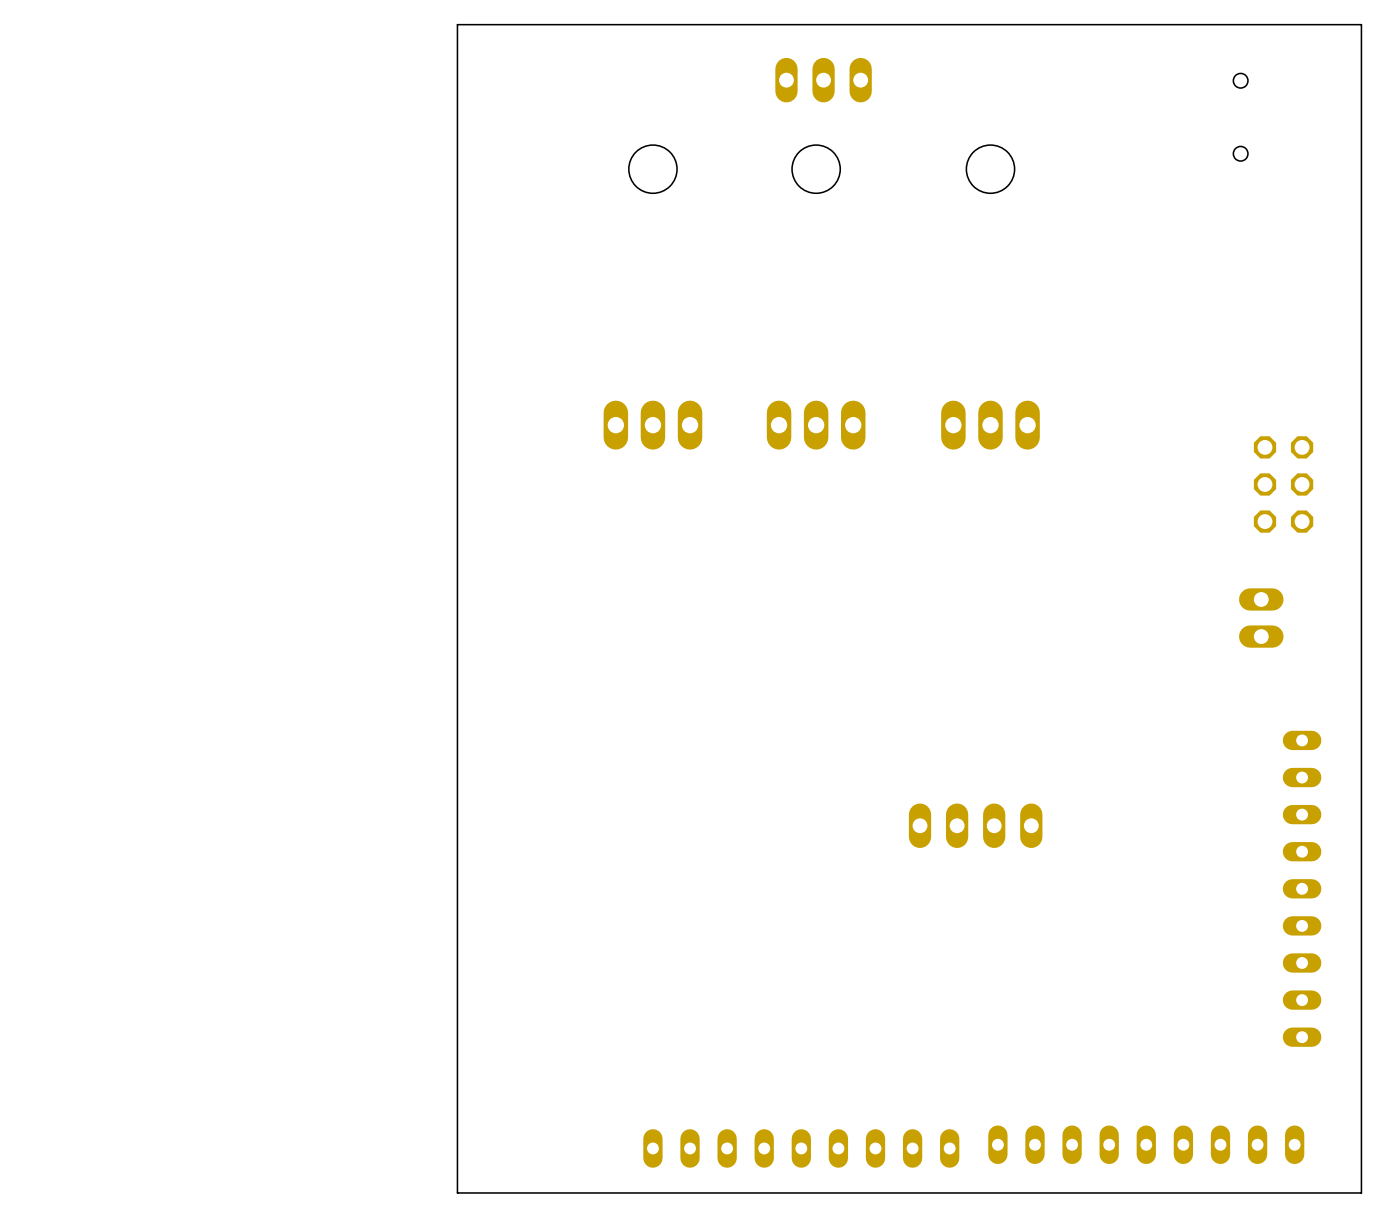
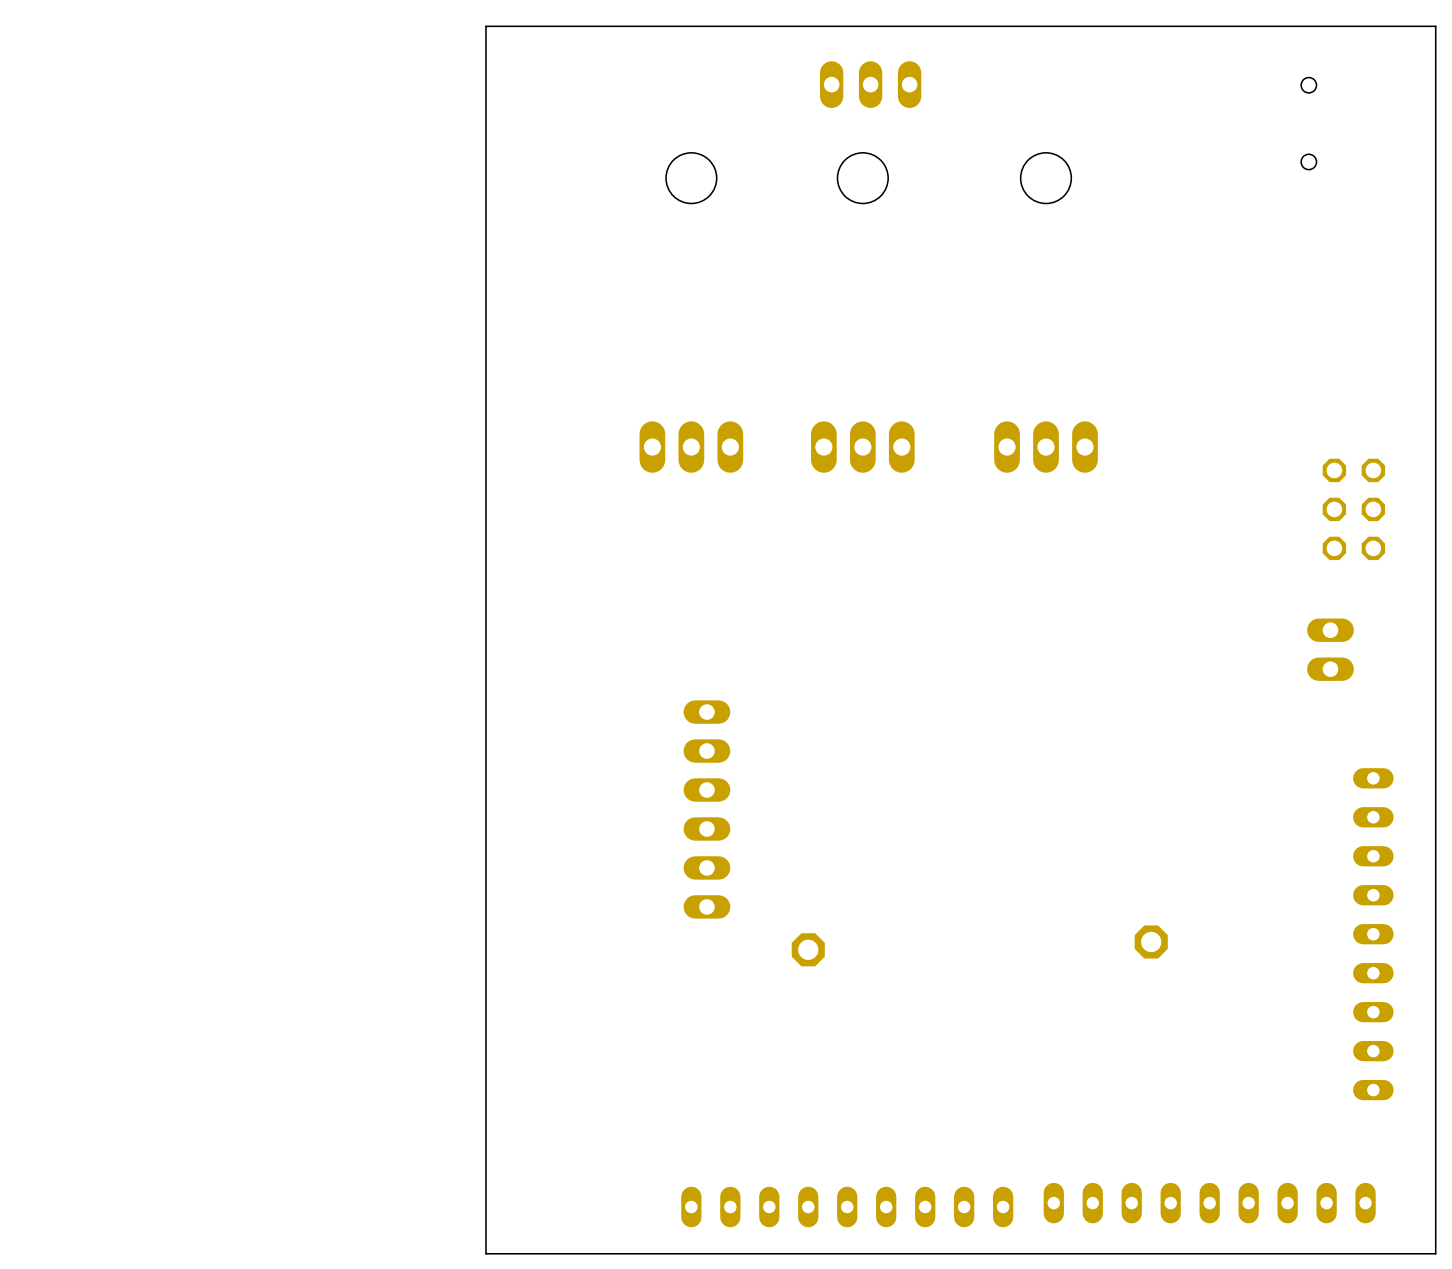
part: none -> (706, 809)
part: (975, 825) -> none
part: none -> (1151, 942)
part: none -> (808, 949)

